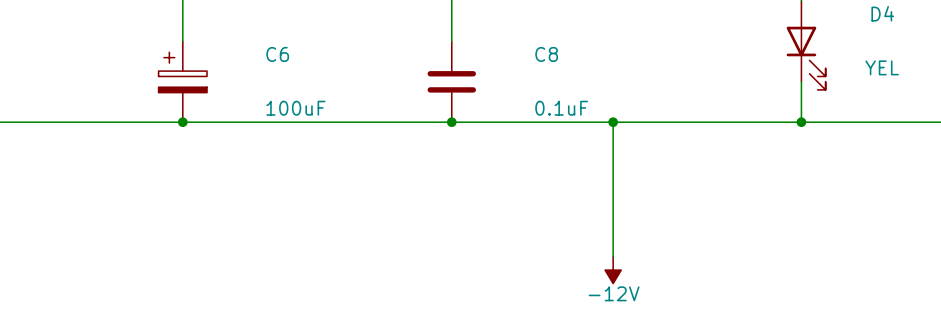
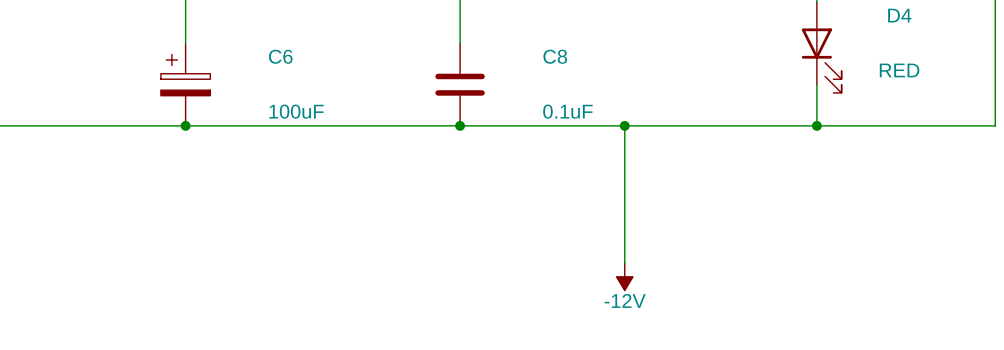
D4 value: YEL (882, 67) -> RED (899, 70)

